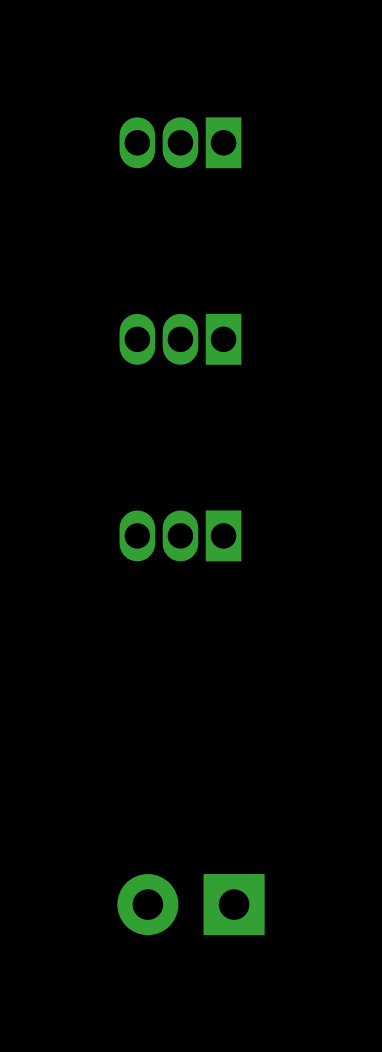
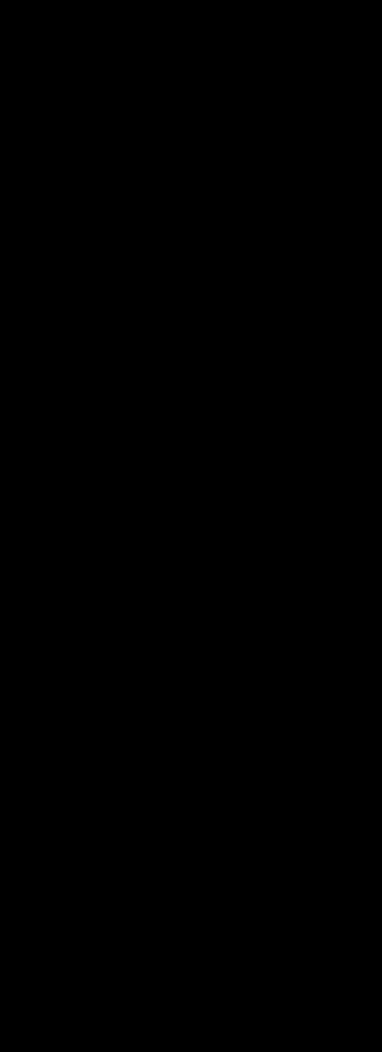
part: (180, 142) -> none
part: (180, 339) -> none
part: (180, 535) -> none
part: (190, 904) -> none

